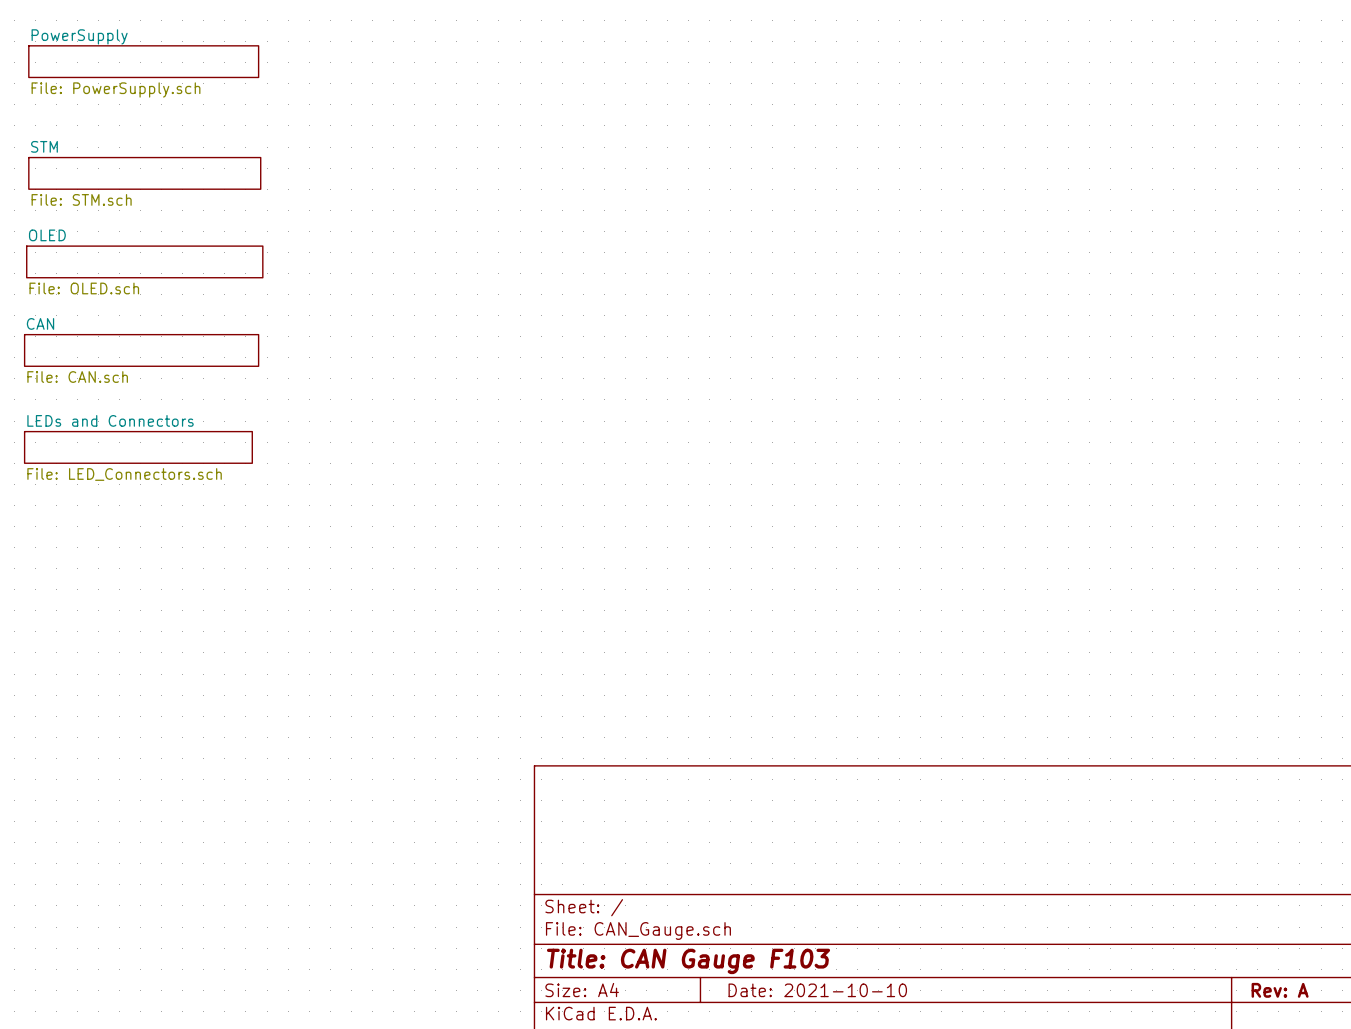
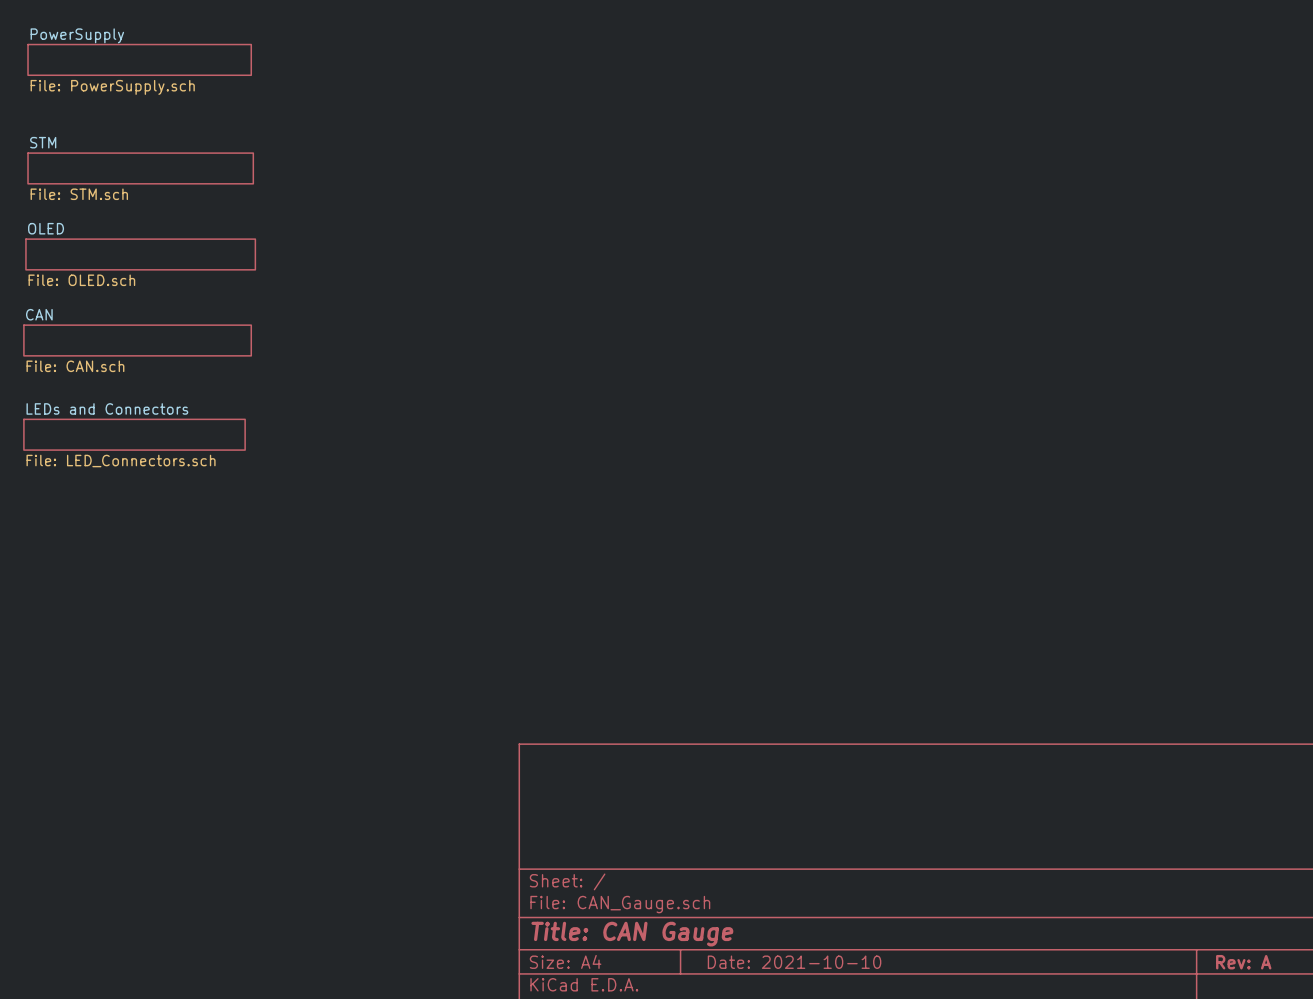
title block: Title: CAN Gauge F103 (688, 961) -> Title: CAN Gauge (632, 934)

